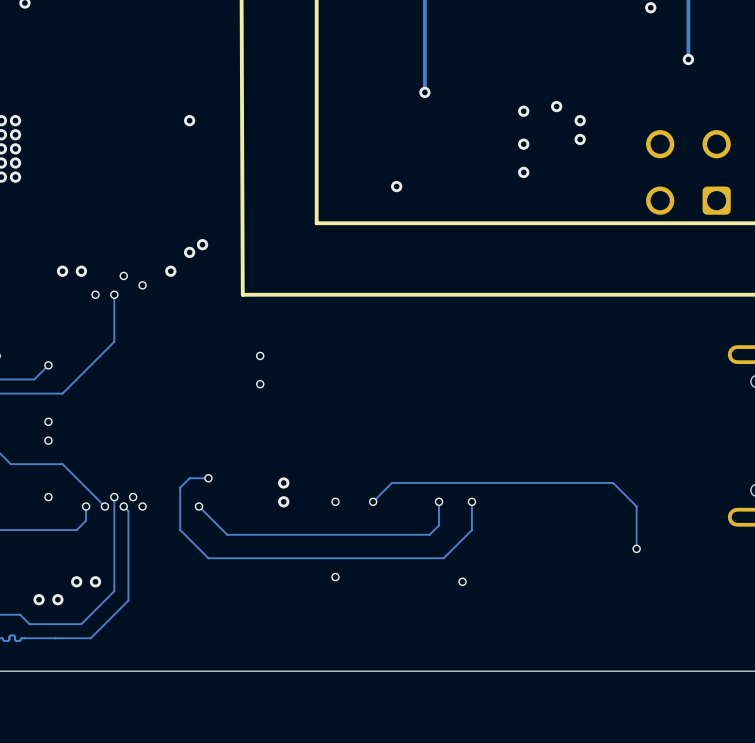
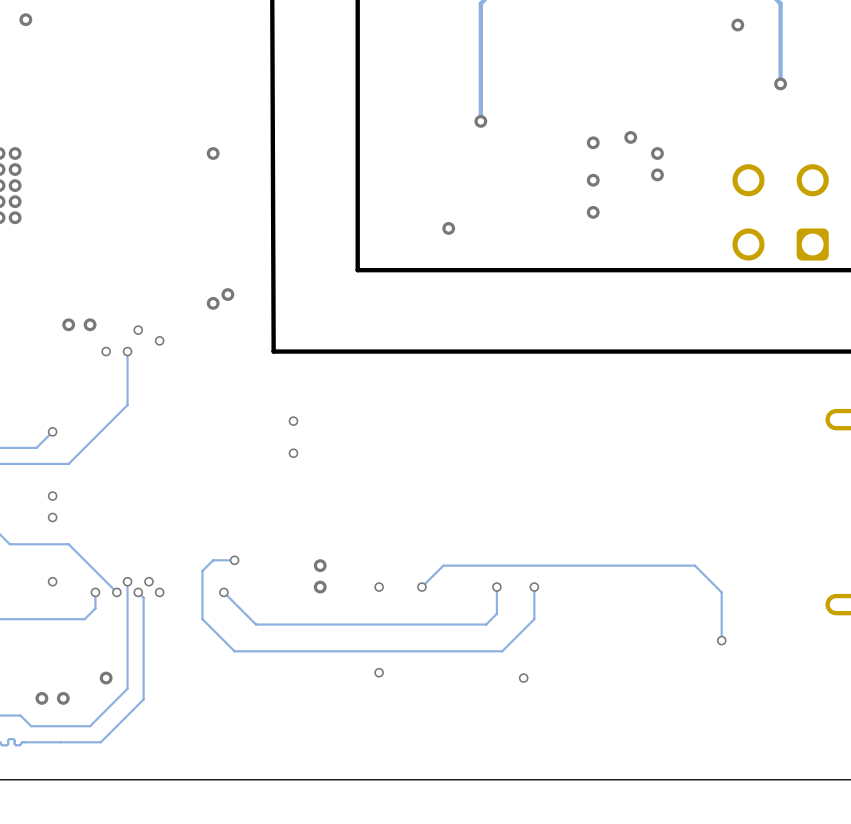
via: (170, 271) -> none
via: (76, 581) -> none

